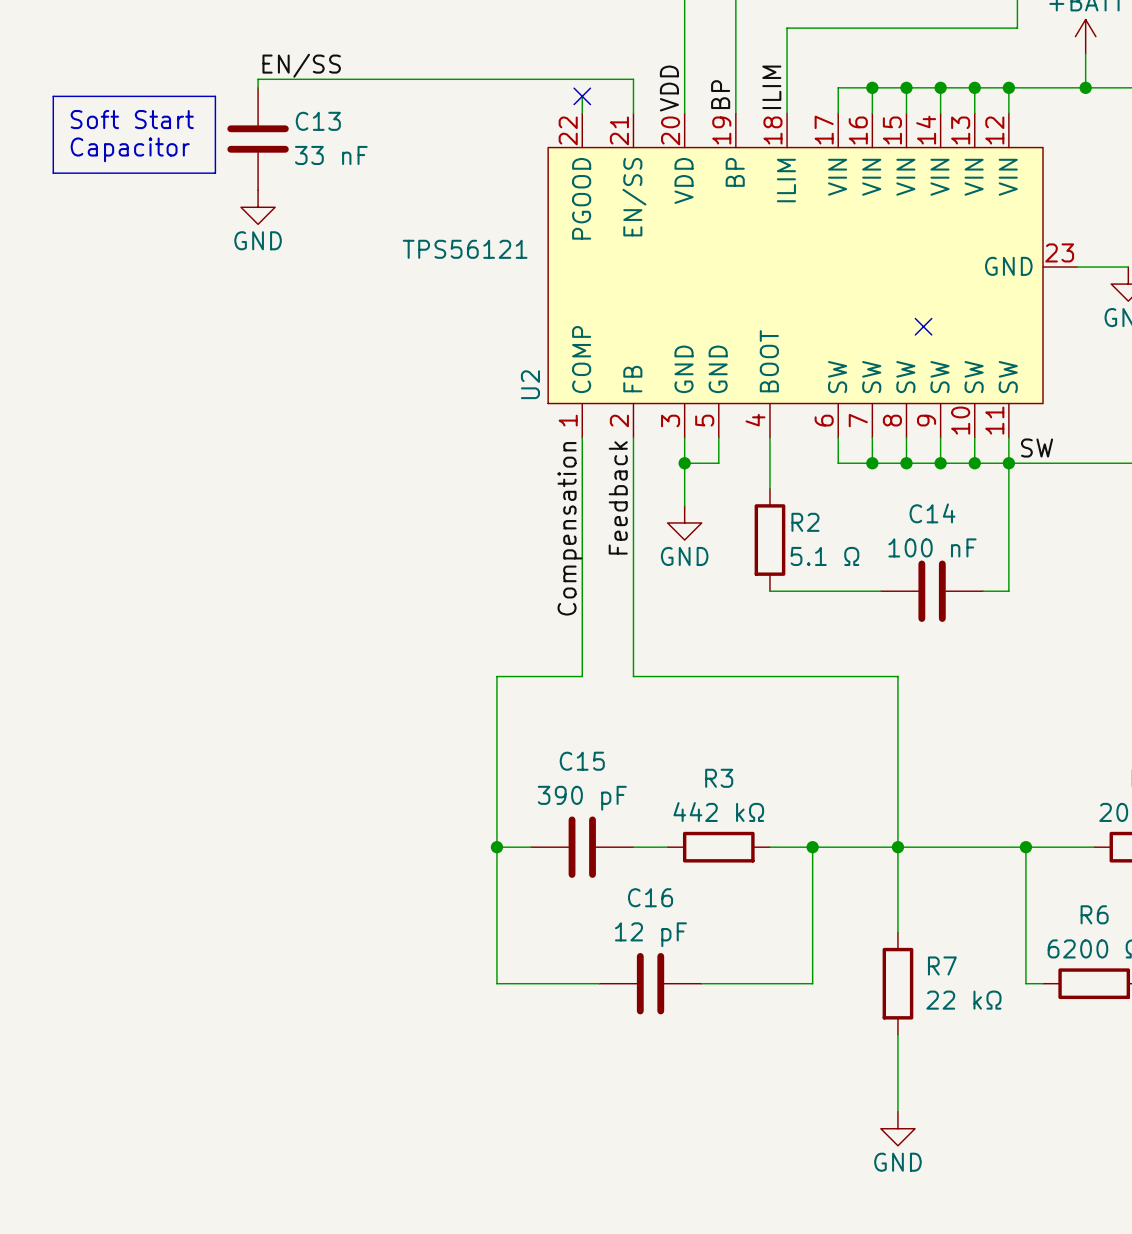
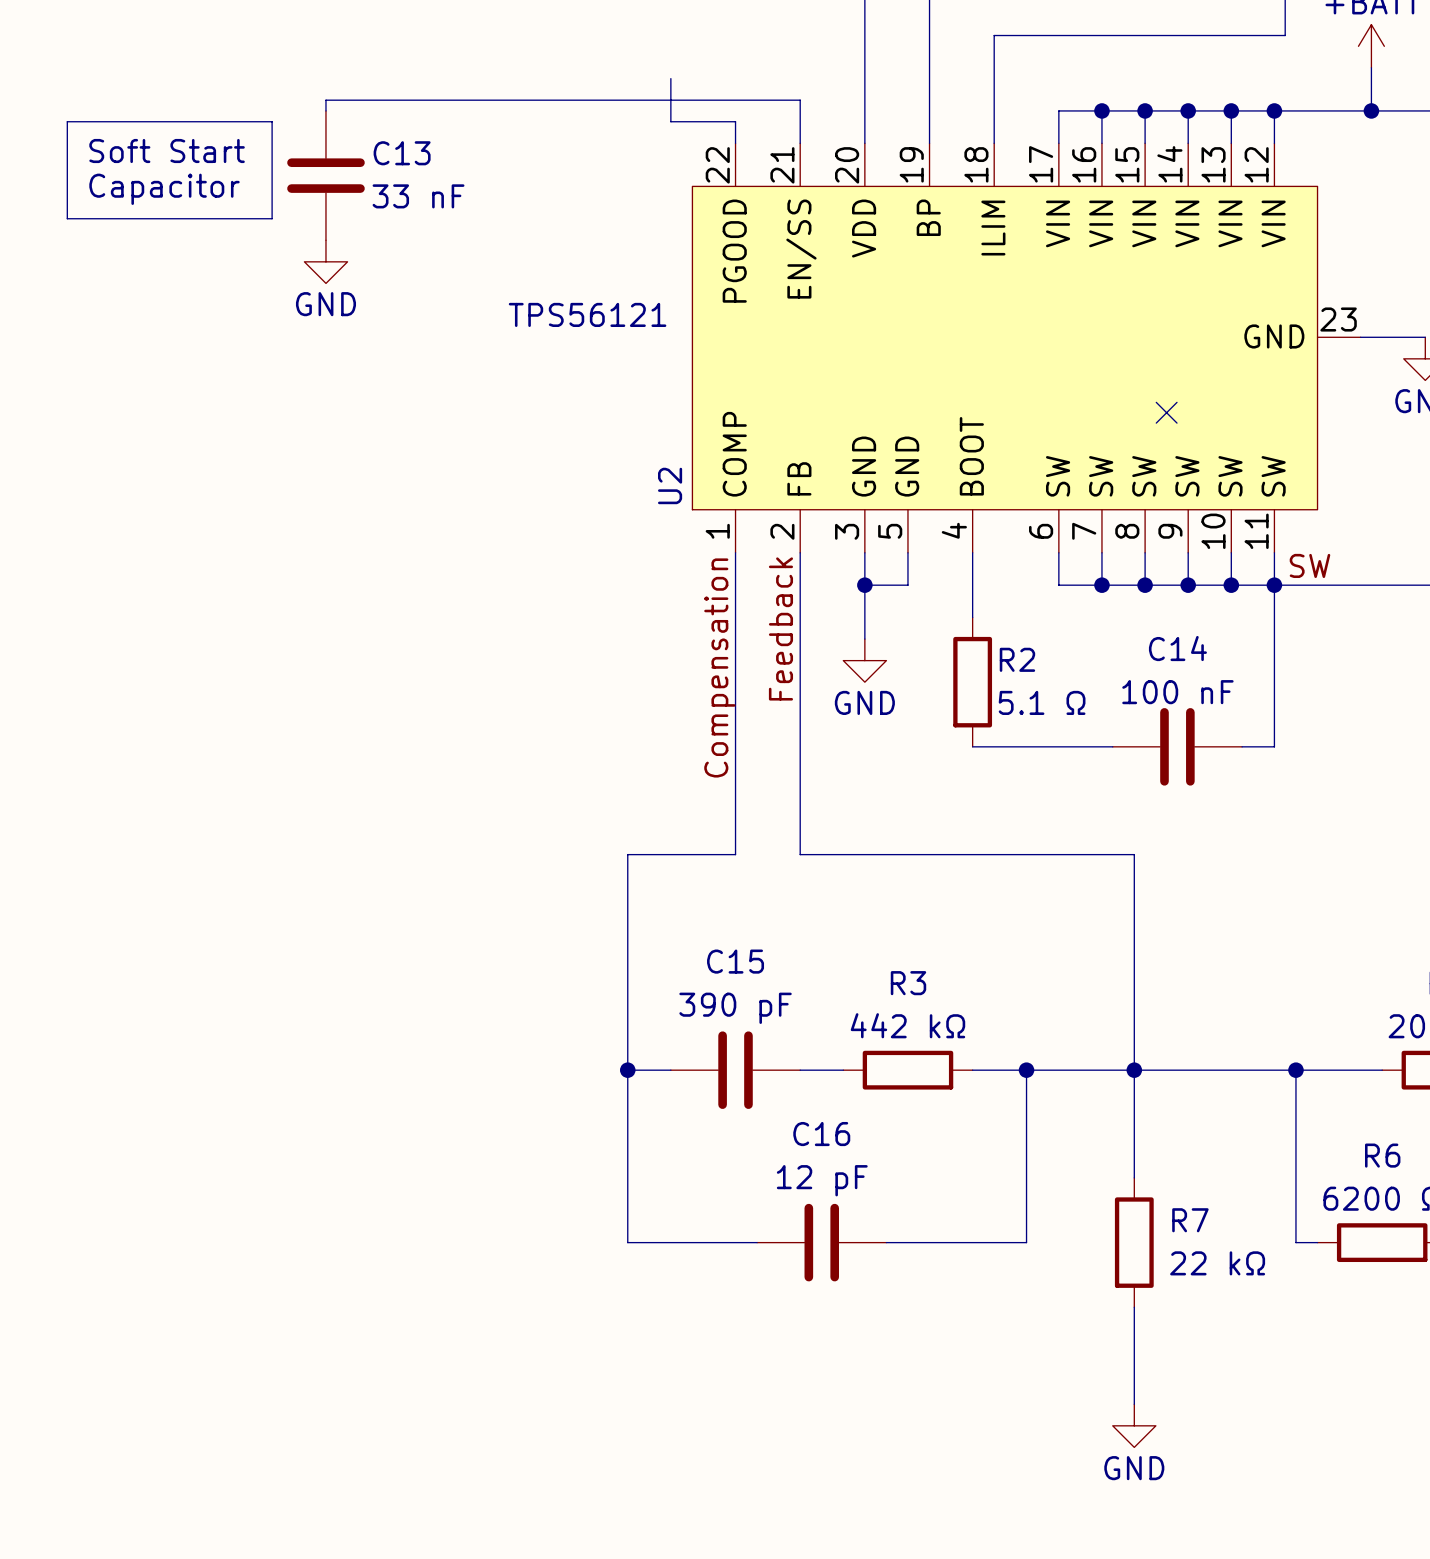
wire: none -> (670, 78) (670, 121) (735, 121)
label: EN/SS (301, 65) -> none
label: ILIM (771, 87) -> none
label: VDD (669, 88) -> none
label: BP (720, 94) -> none
no-connect mark: (582, 96) -> none

